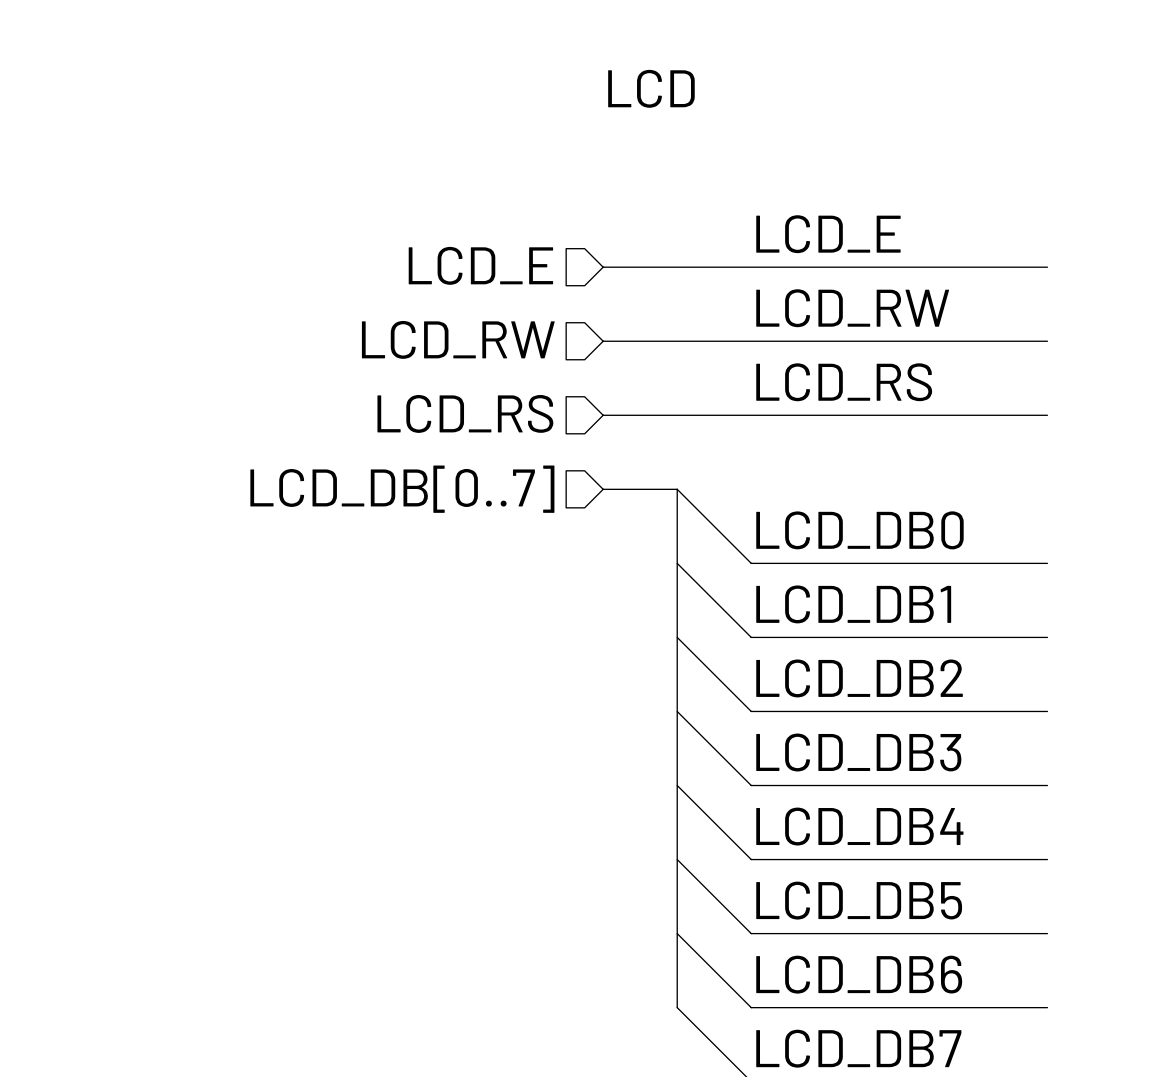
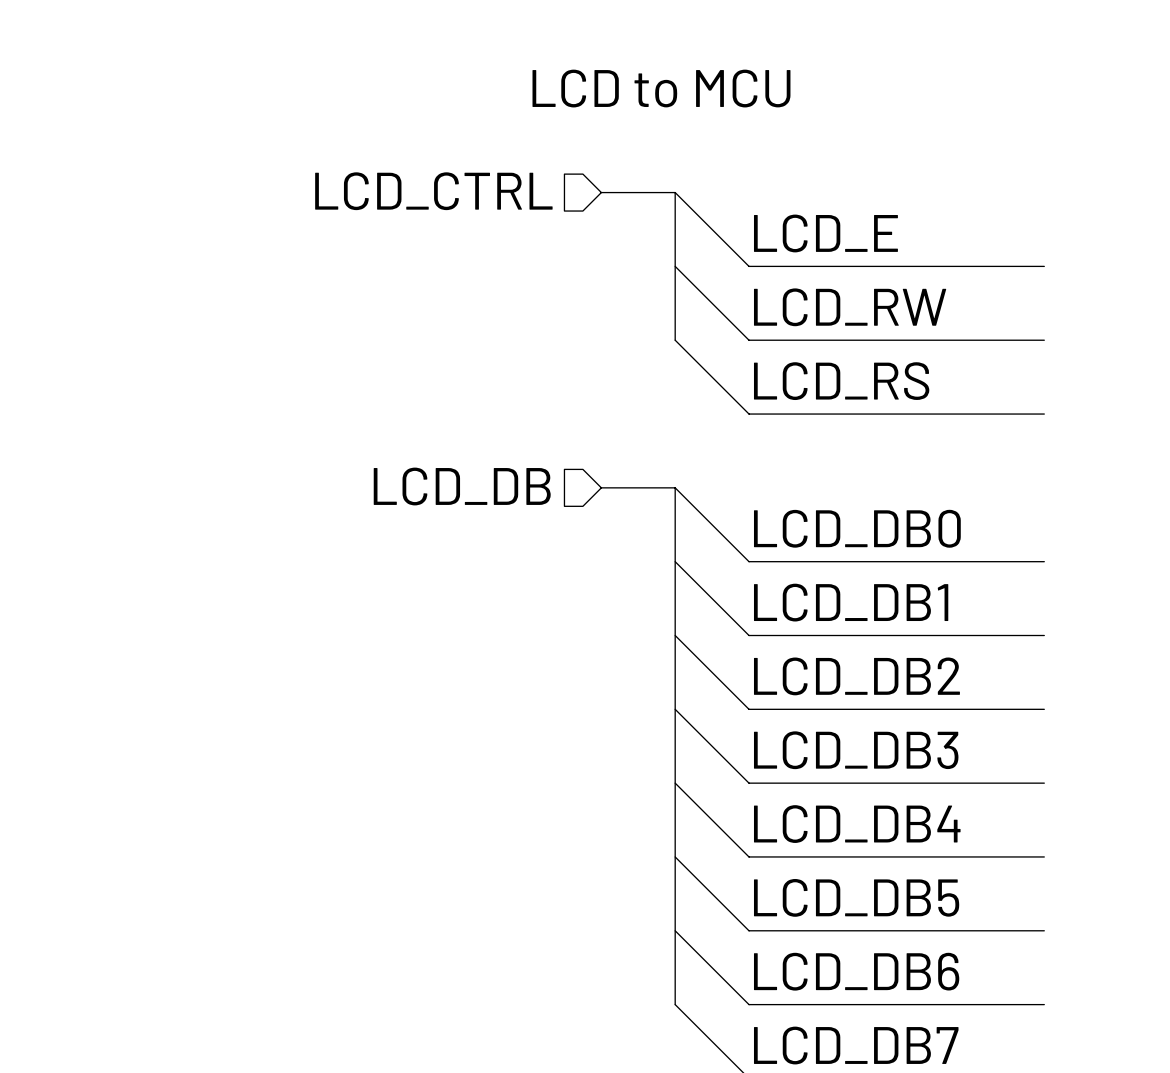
text: LCD (651, 88) -> none
text: none -> LCD to MCU (661, 88)
bus: none -> (601, 192) (675, 192) (675, 340)
hierarchical label: LCD_E (480, 265) -> LCD_CTRL (433, 191)
wire: (603, 267) (751, 267) -> (675, 192) (749, 266)
hierarchical label: LCD_RW (458, 339) -> none
wire: (603, 341) (751, 341) -> (675, 266) (749, 340)
hierarchical label: LCD_RS (465, 413) -> none
wire: (603, 415) (751, 415) -> (675, 340) (749, 414)
hierarchical label: LCD_DB[0..7] (402, 489) -> LCD_DB (462, 486)

